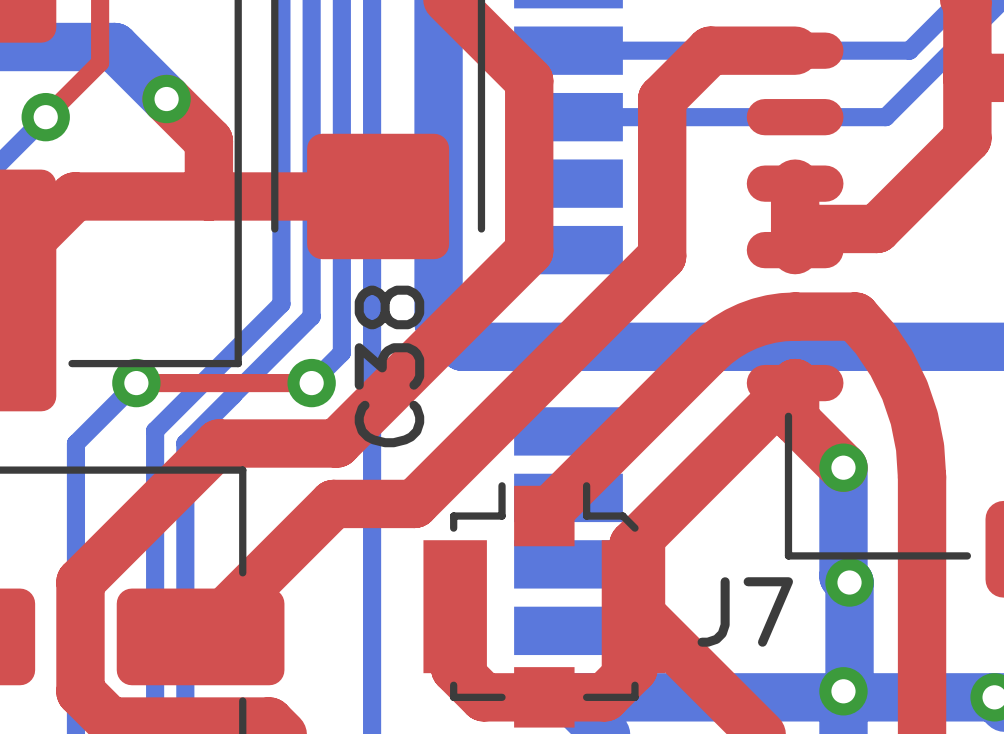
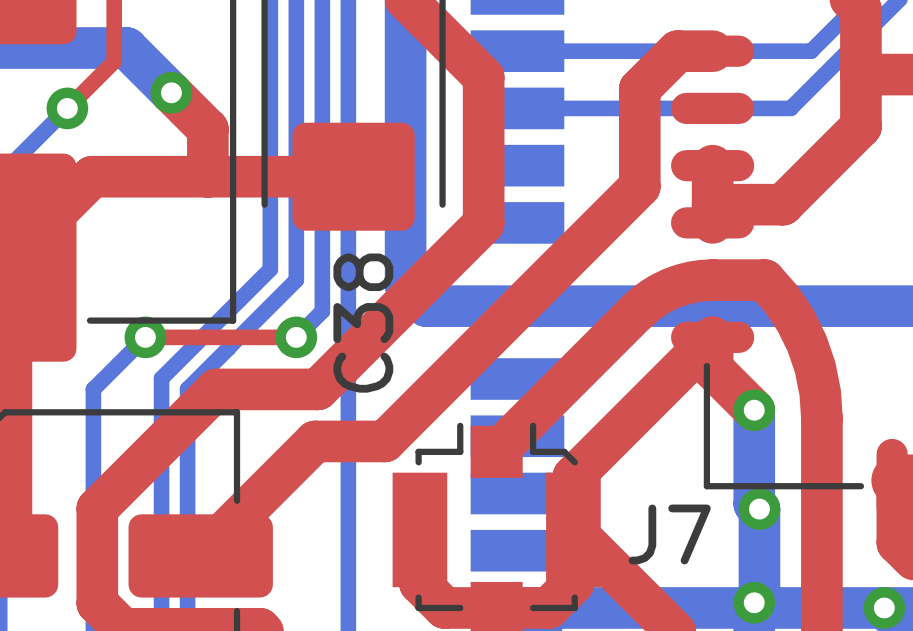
top track: (754, 50) (710, 50) (662, 99) (662, 256) -> (677, 51) (639, 89) (639, 186) (598, 228)

